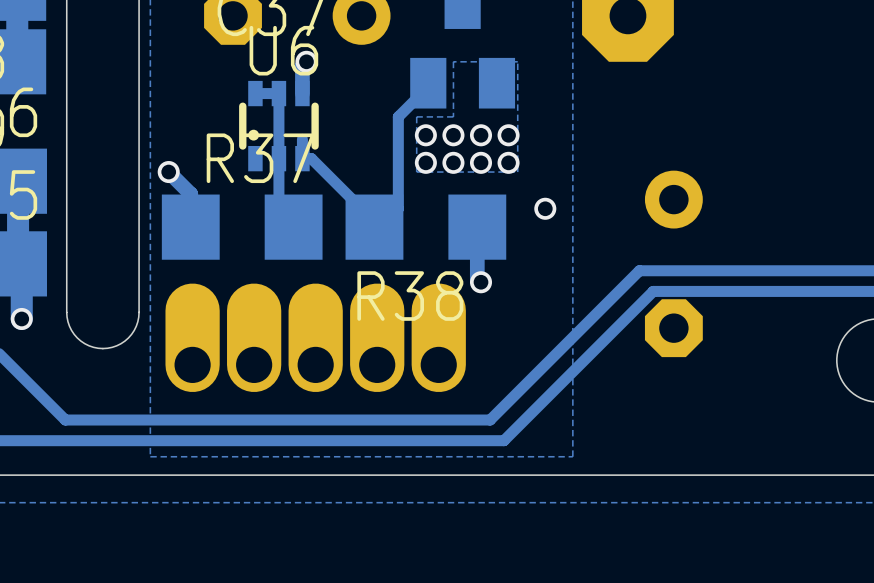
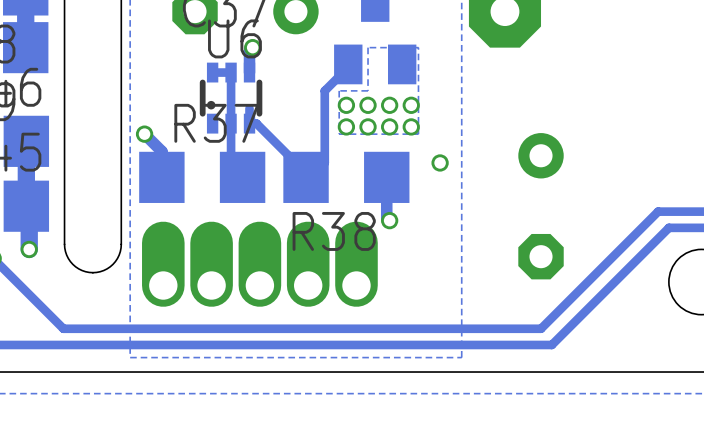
track: (823, 270) (639, 270) (490, 420) -> (658, 211) (541, 328) (396, 328)
track: (836, 291) (653, 291) (503, 440) -> (668, 227) (551, 344) (407, 344)

